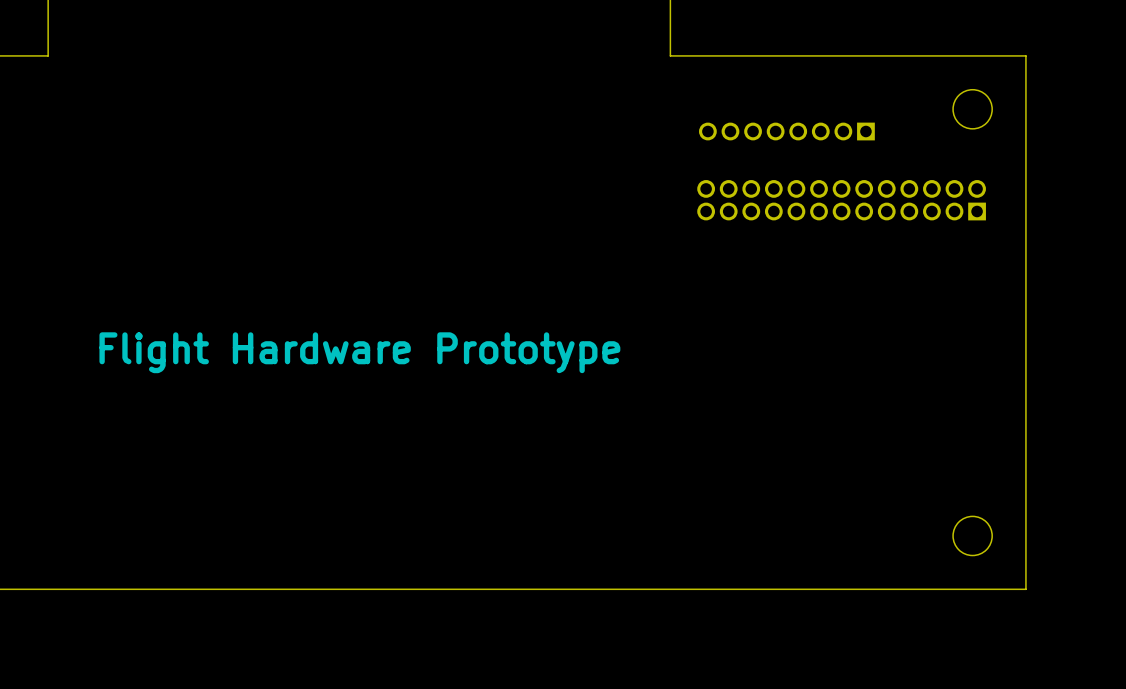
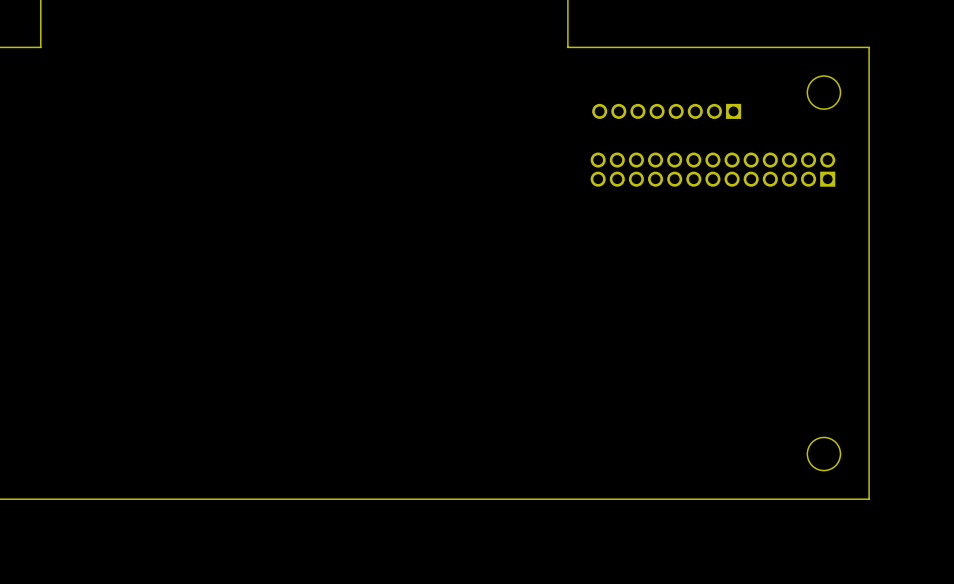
text: Flight Hardware Prototype (359, 352) -> none

